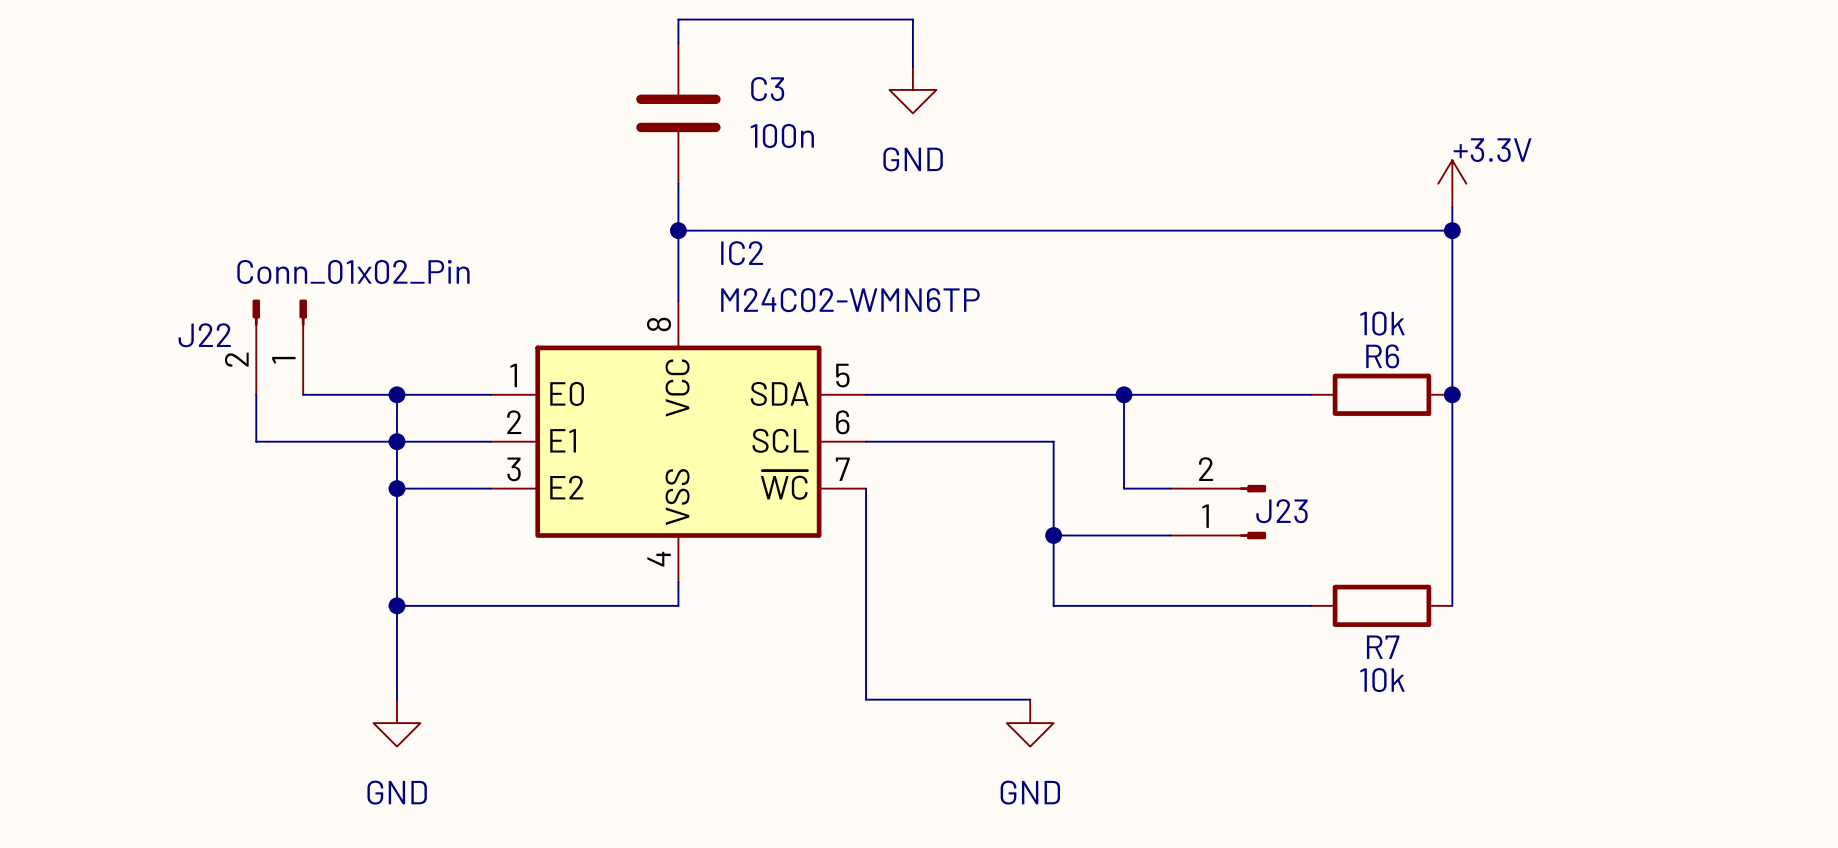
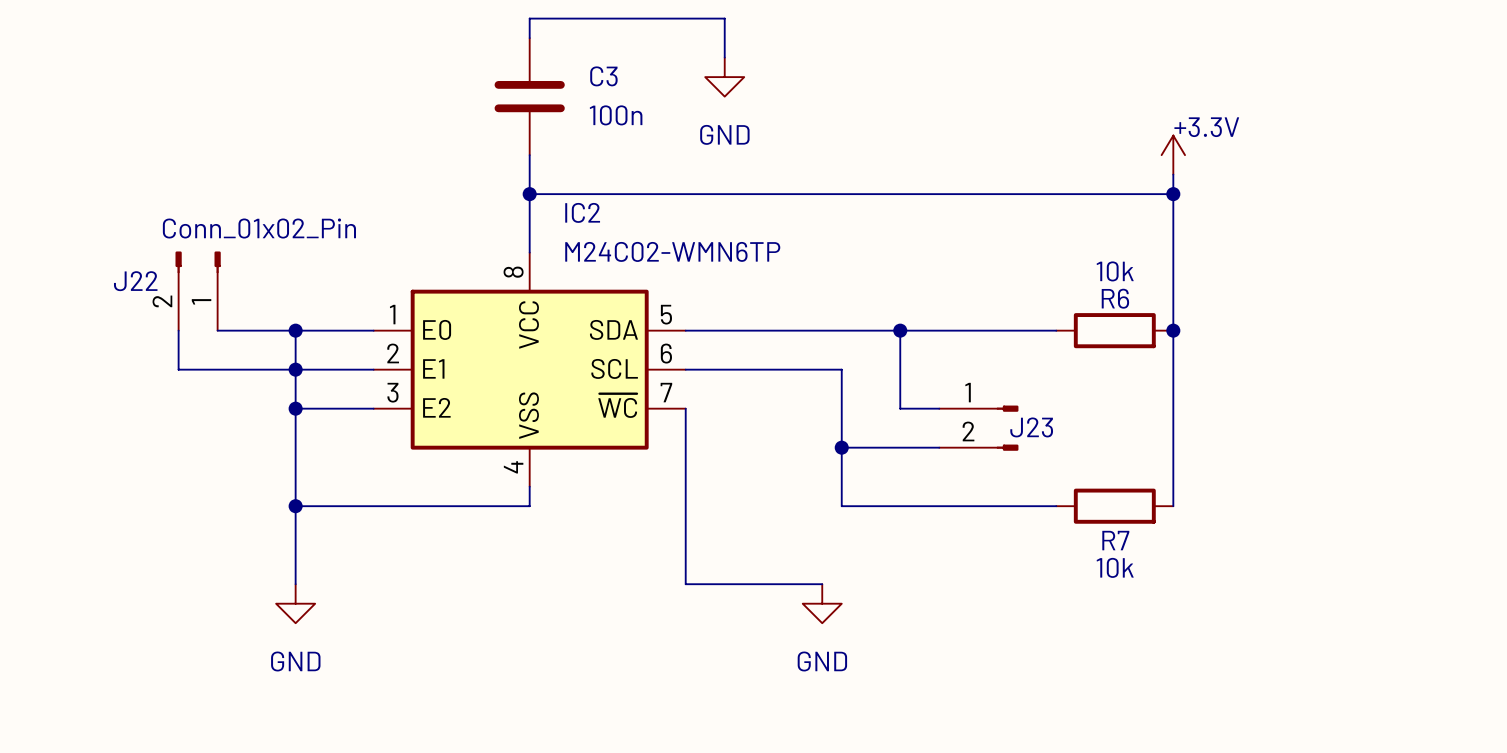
J23 flip: as is (1252, 512) -> up-down (1007, 428)

